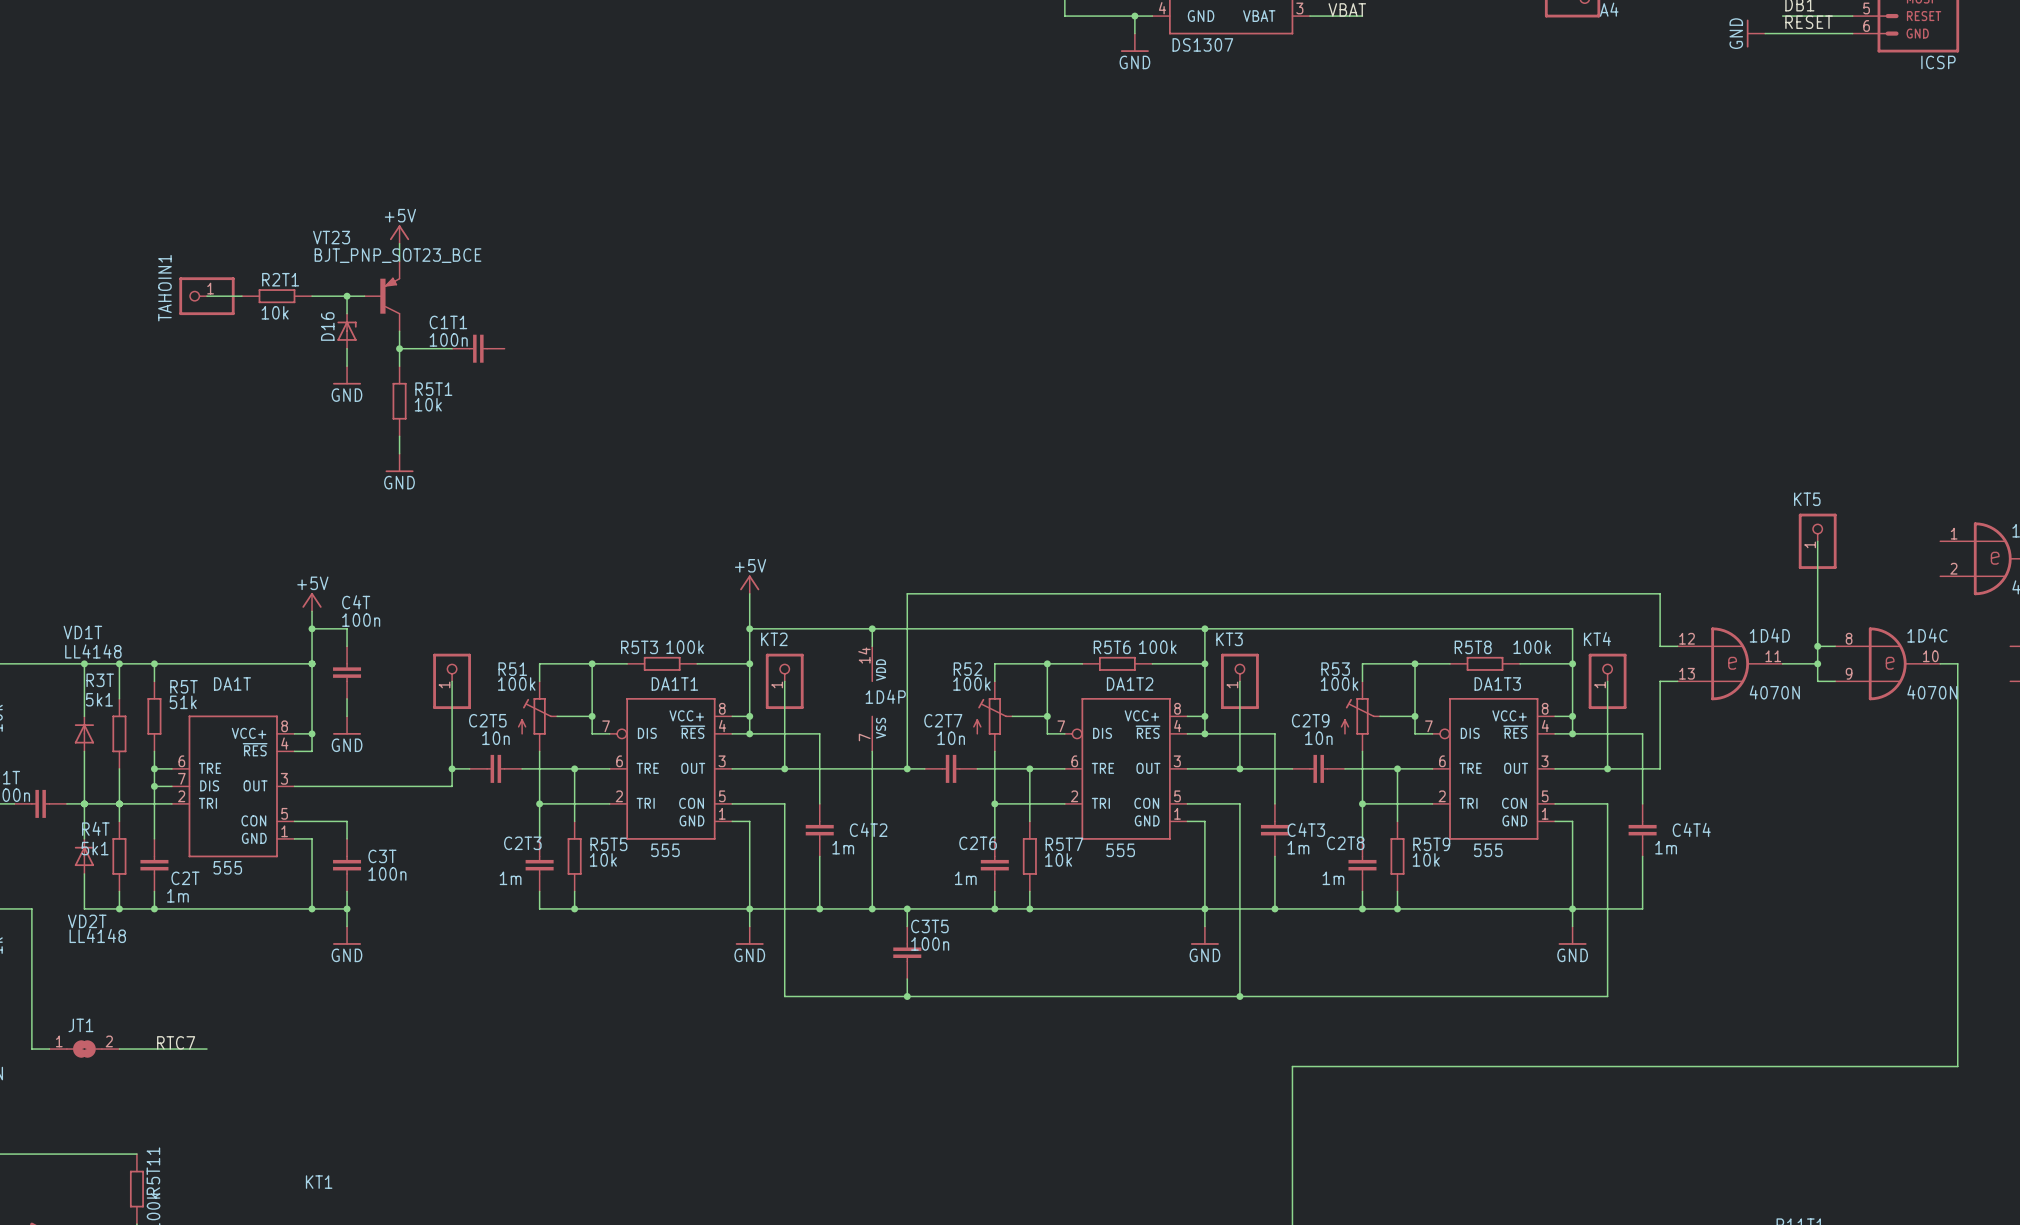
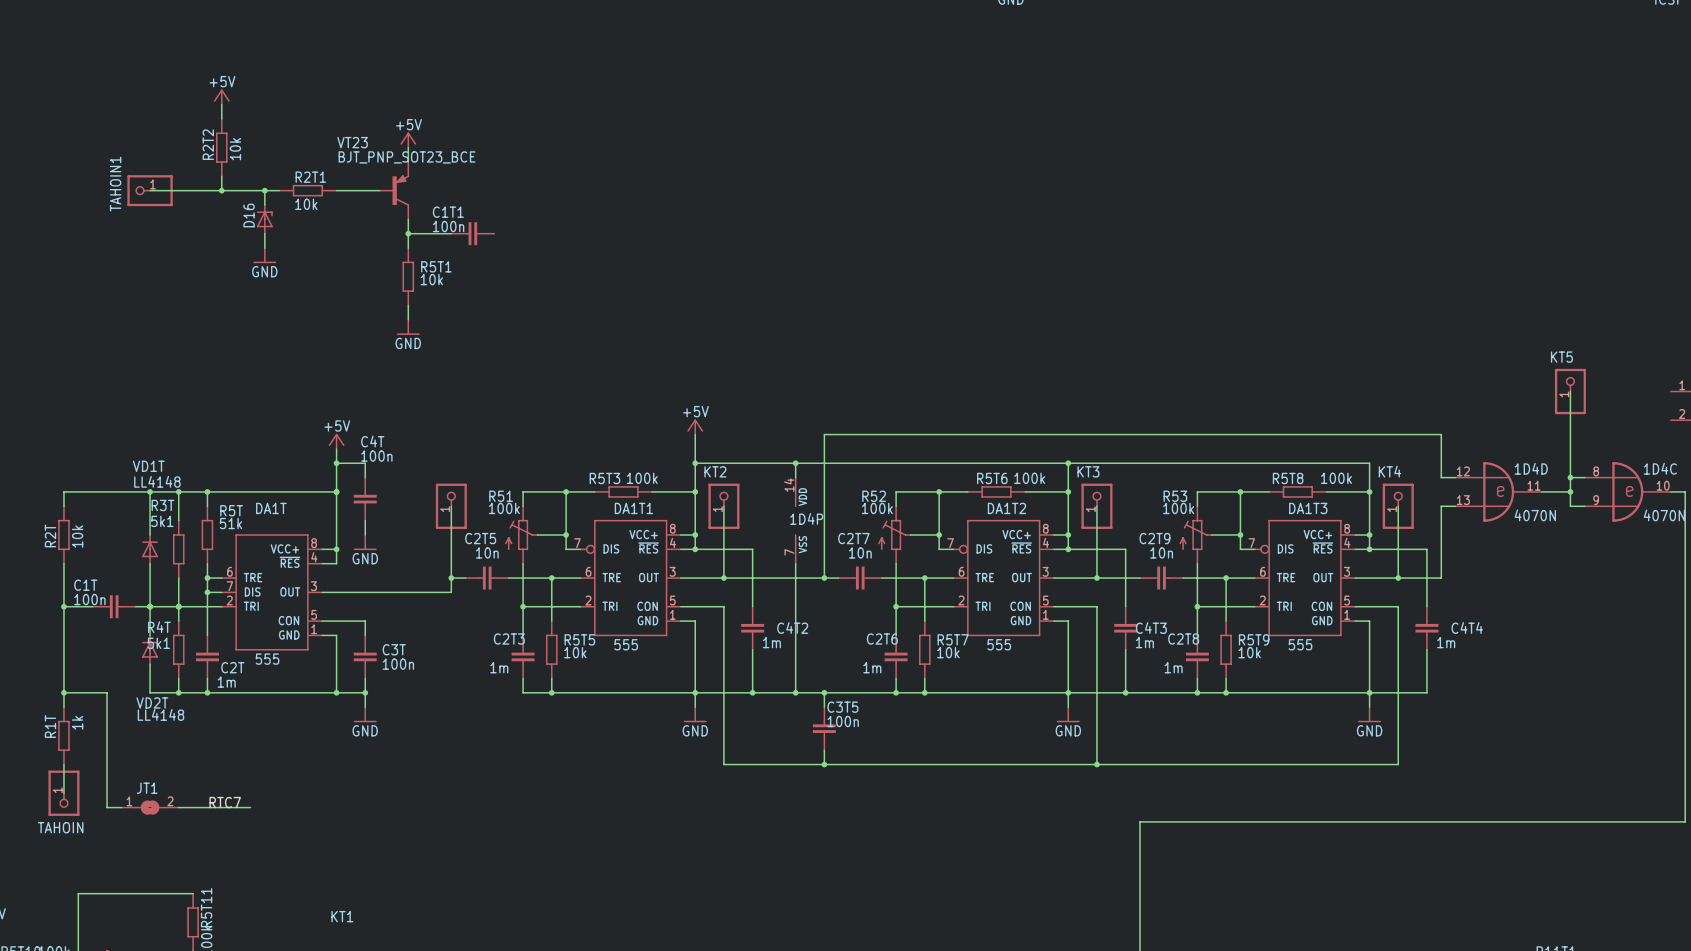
power symbol: none -> +5V (221, 97)
wire: none -> (221, 104) (221, 118)
R2T2: none -> 10k (221, 147)
wire: none -> (221, 176) (221, 190)
wire: none -> (150, 190) (250, 190)
junction: none -> (221, 190)
TAHOIN1 position: (206, 296) -> (150, 190)
junction: none -> (264, 190)
wire: (347, 296) (347, 313) -> (264, 190) (264, 205)
junction: (347, 296) -> none
D16 position: (347, 331) -> (264, 219)
wire: (347, 348) (347, 366) -> (264, 233) (264, 248)
power symbol position: GND (347, 375) -> GND (264, 255)

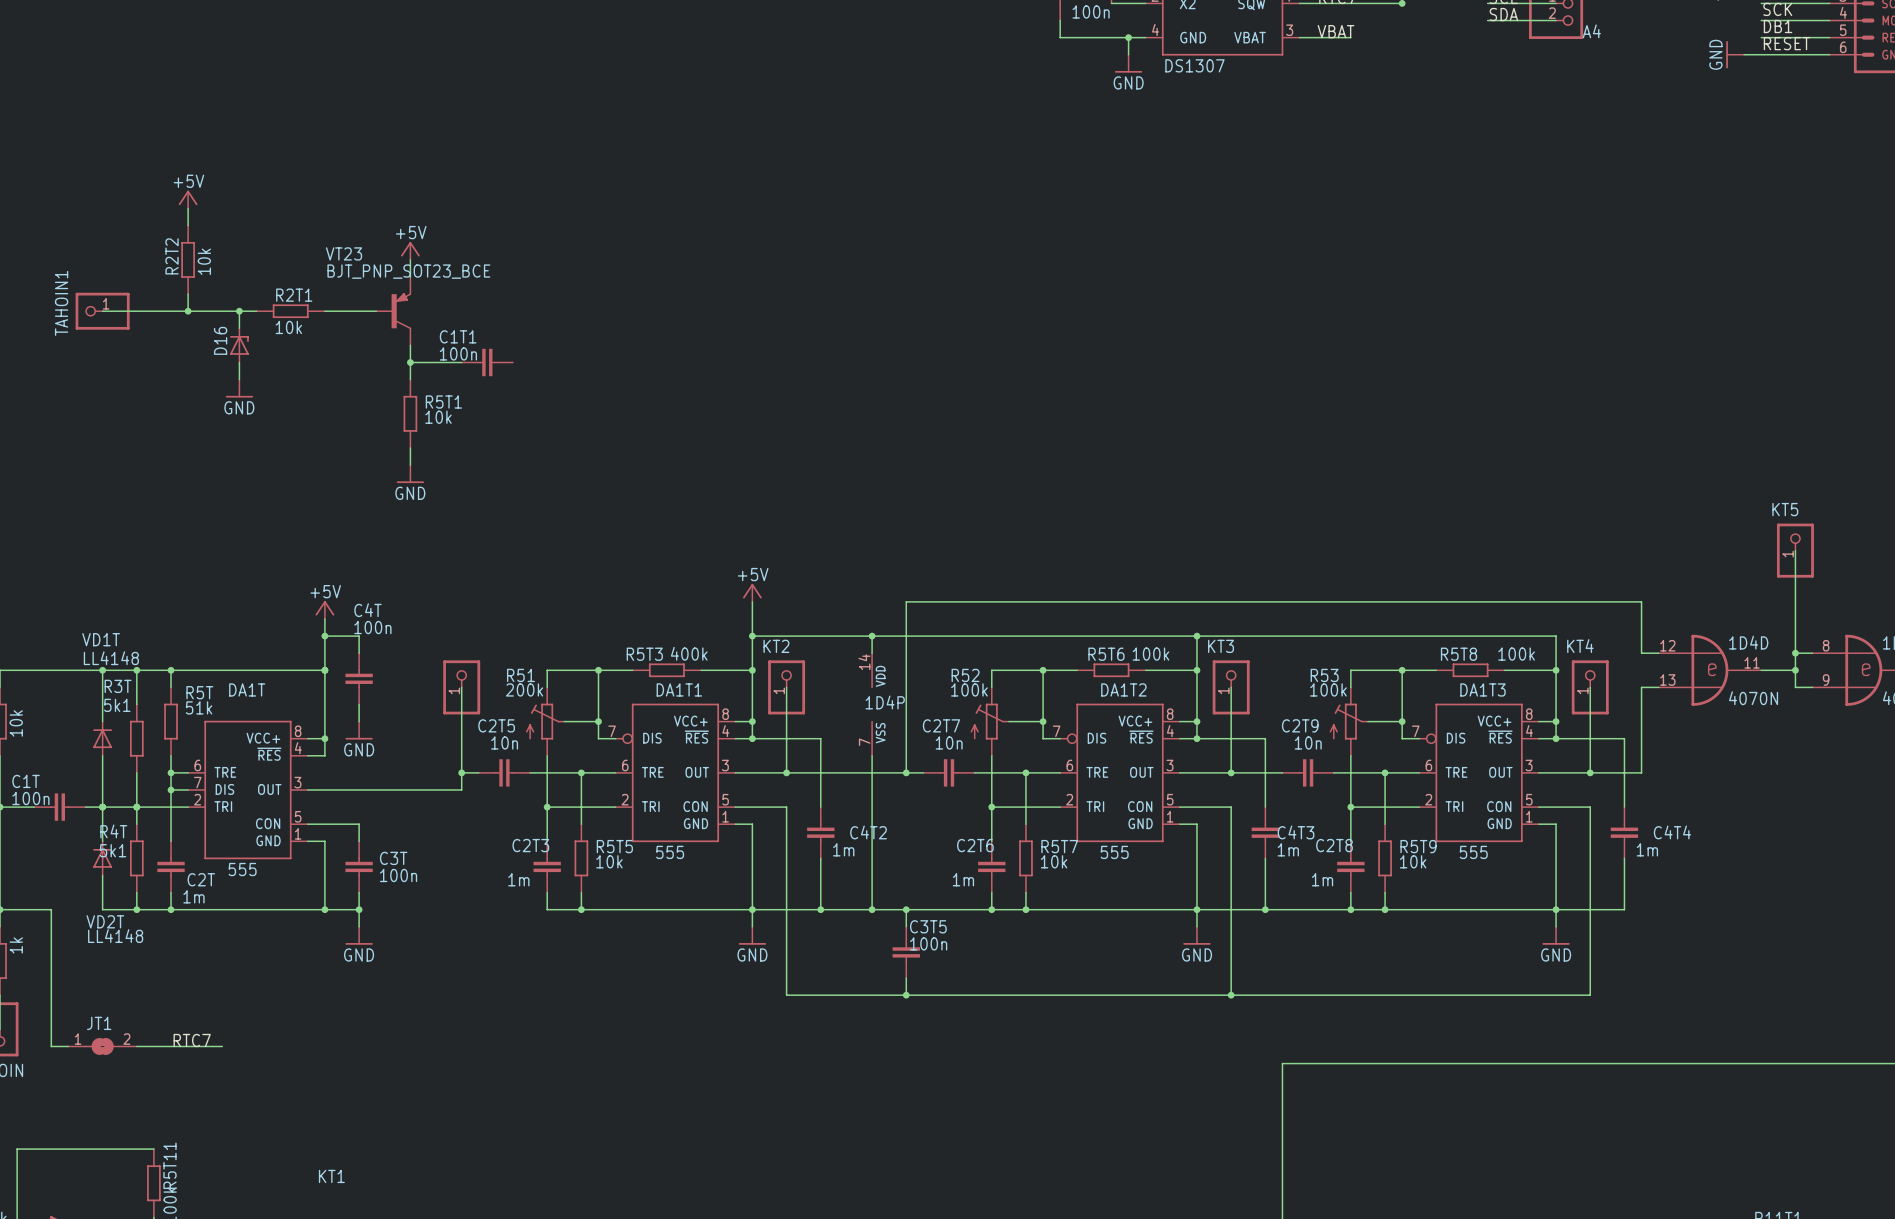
R5T3 value: 100k (642, 478) -> 400k (689, 653)
R51 value: 100k (504, 508) -> 200k (524, 689)

